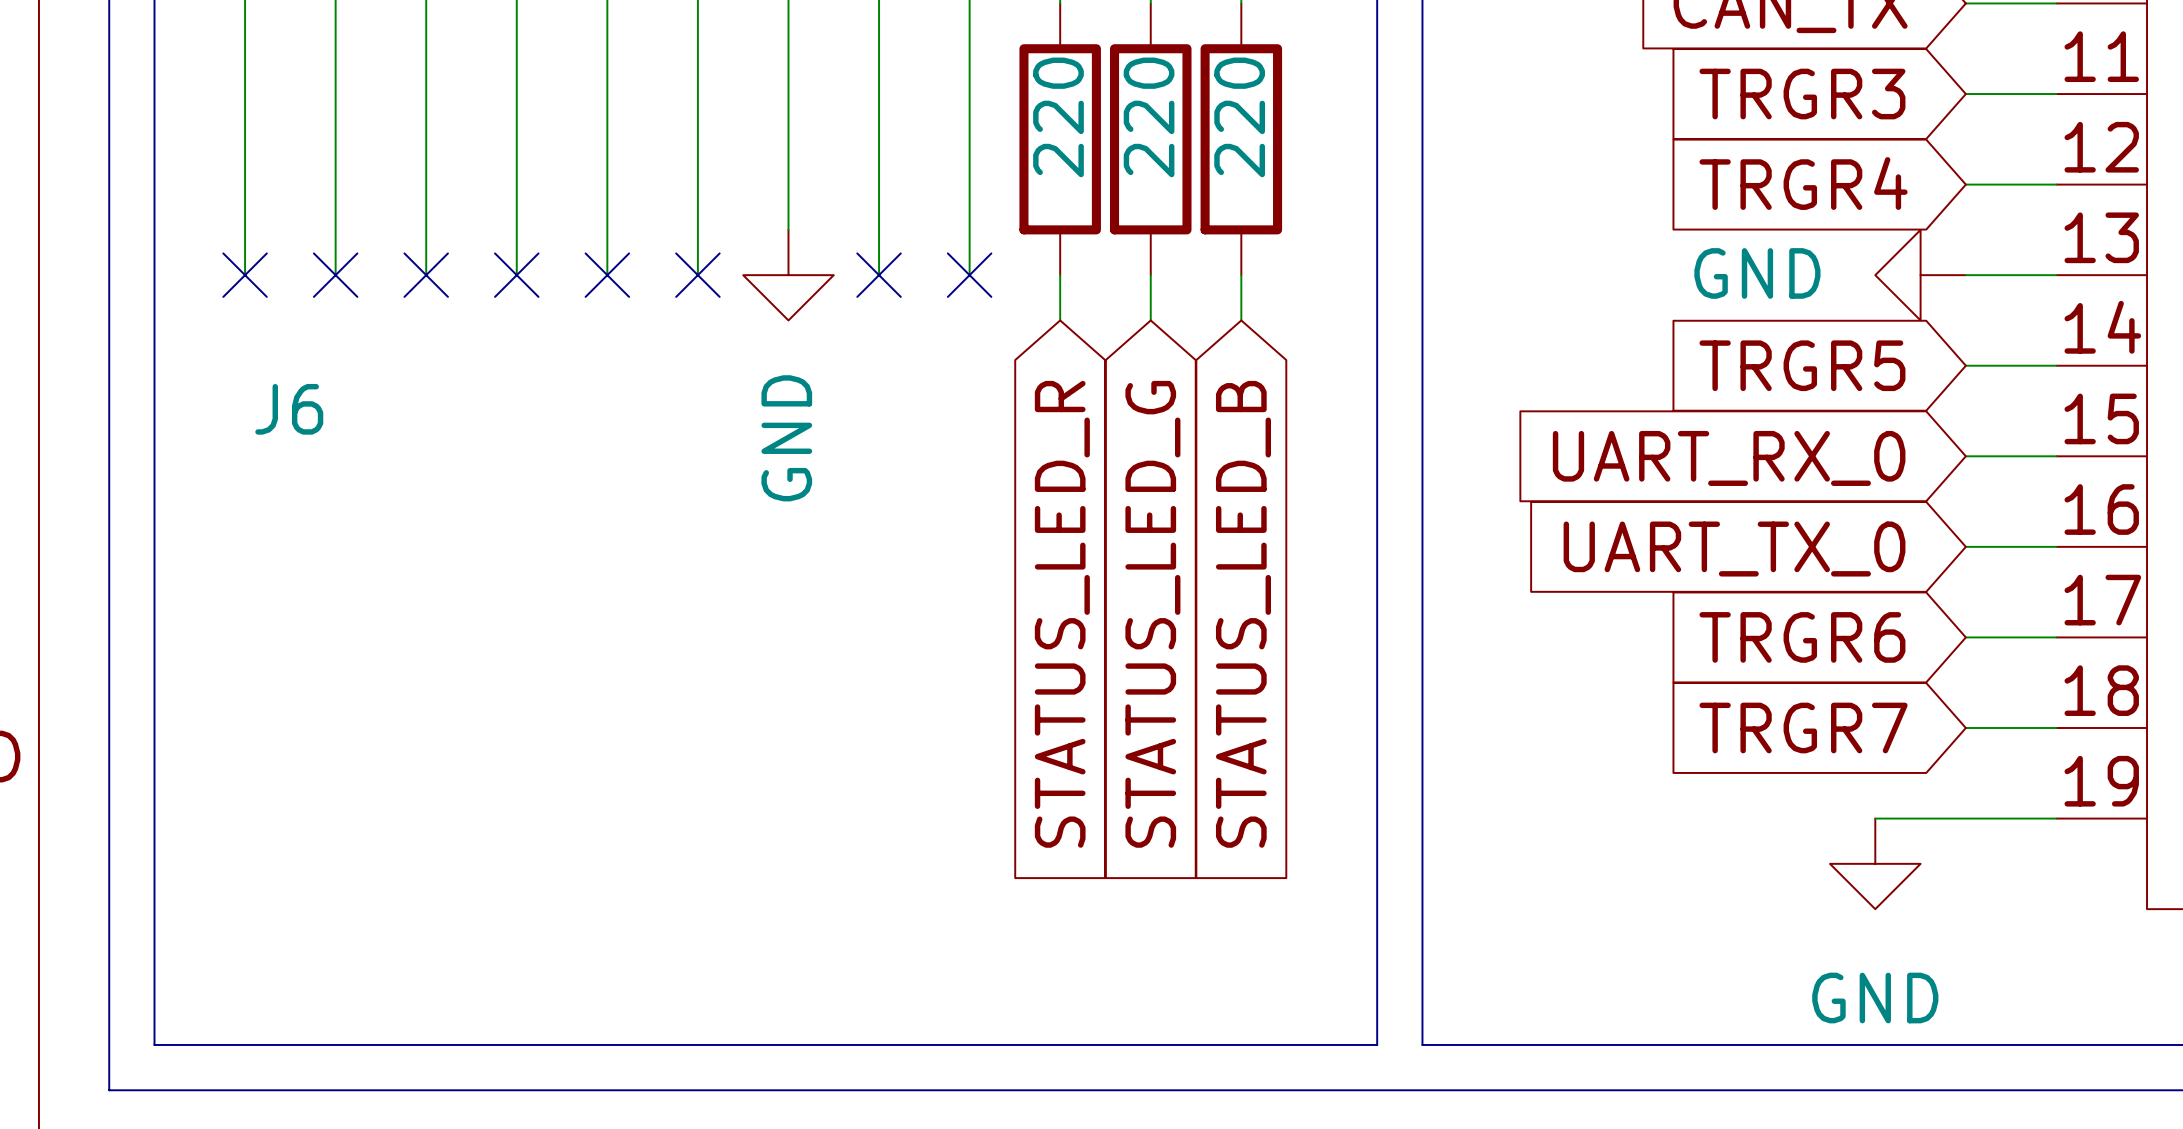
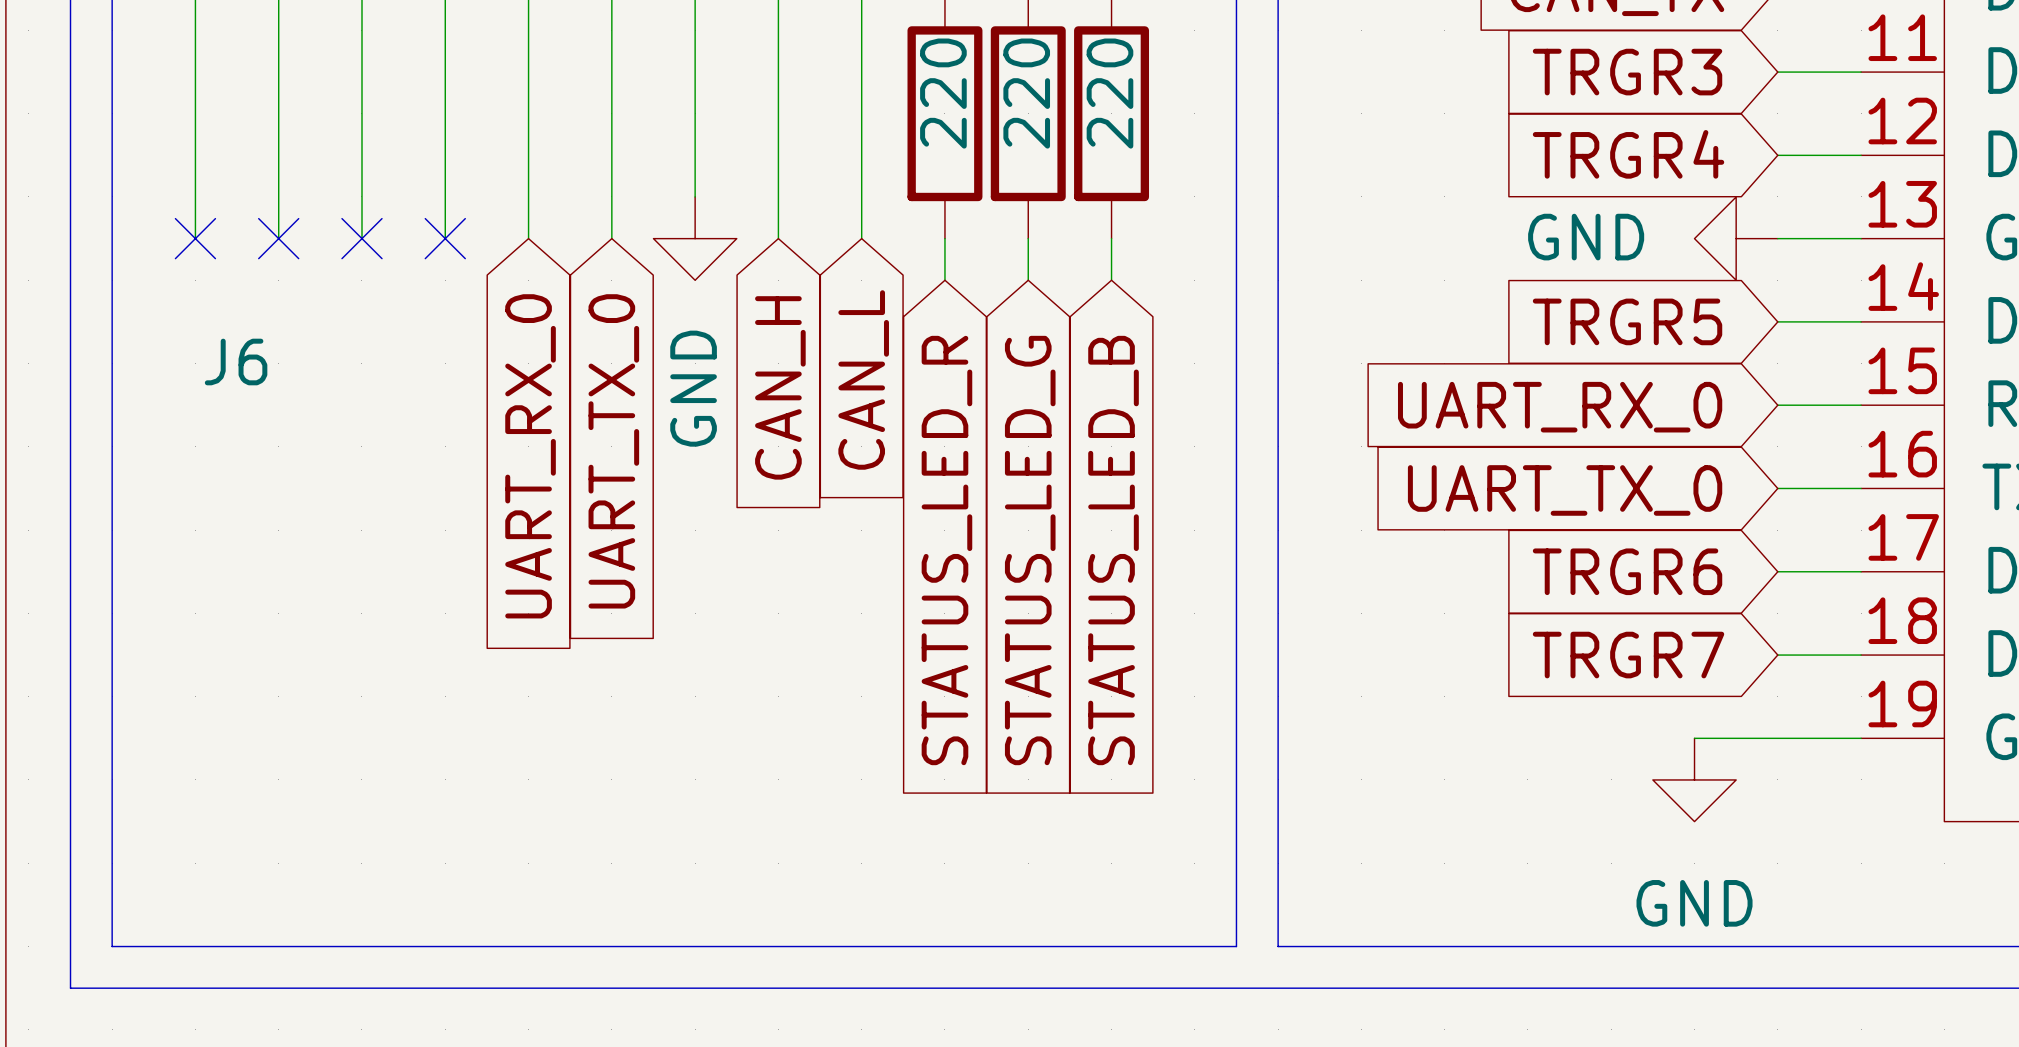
no-connect mark: (607, 275) -> none
no-connect mark: (697, 275) -> none
no-connect mark: (879, 275) -> none
no-connect mark: (969, 275) -> none
global label: none -> CAN_L (863, 379)
global label: none -> CAN_H (780, 387)
global label: none -> UART_TX_0 (613, 451)
global label: none -> UART_RX_0 (530, 456)

